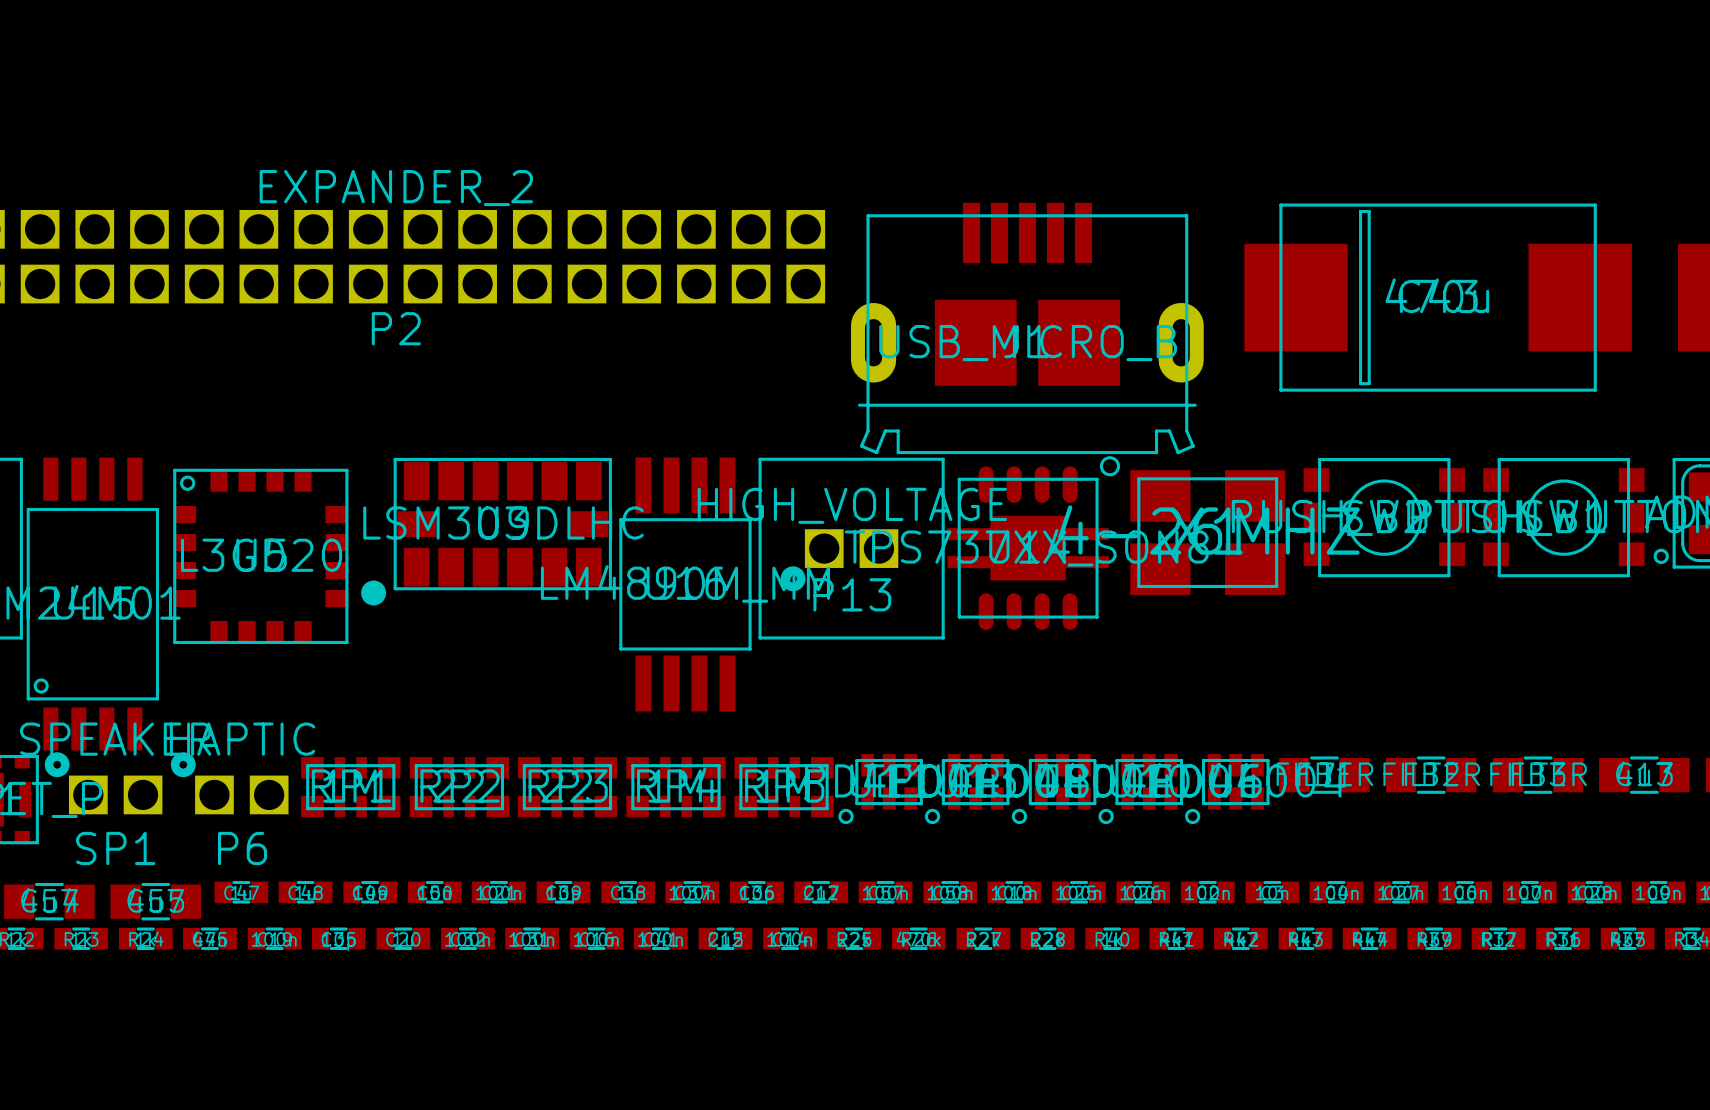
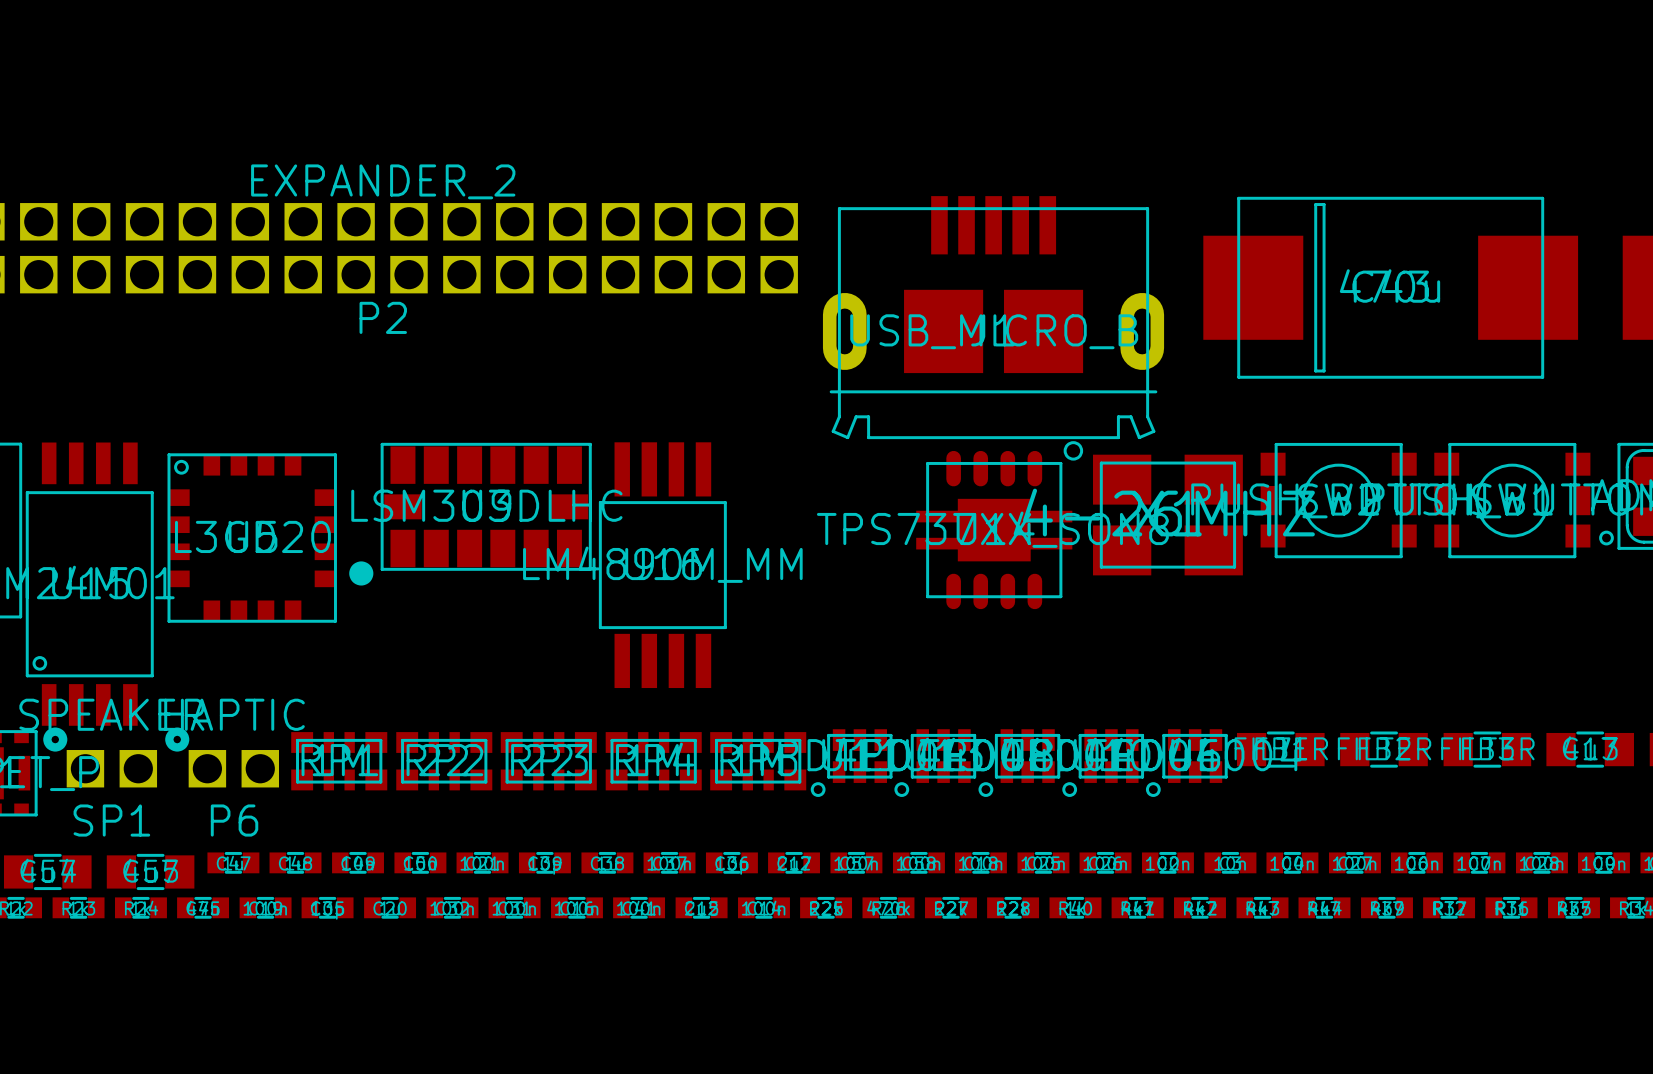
P13: HIGH_VOLTAGE (851, 548) -> none

